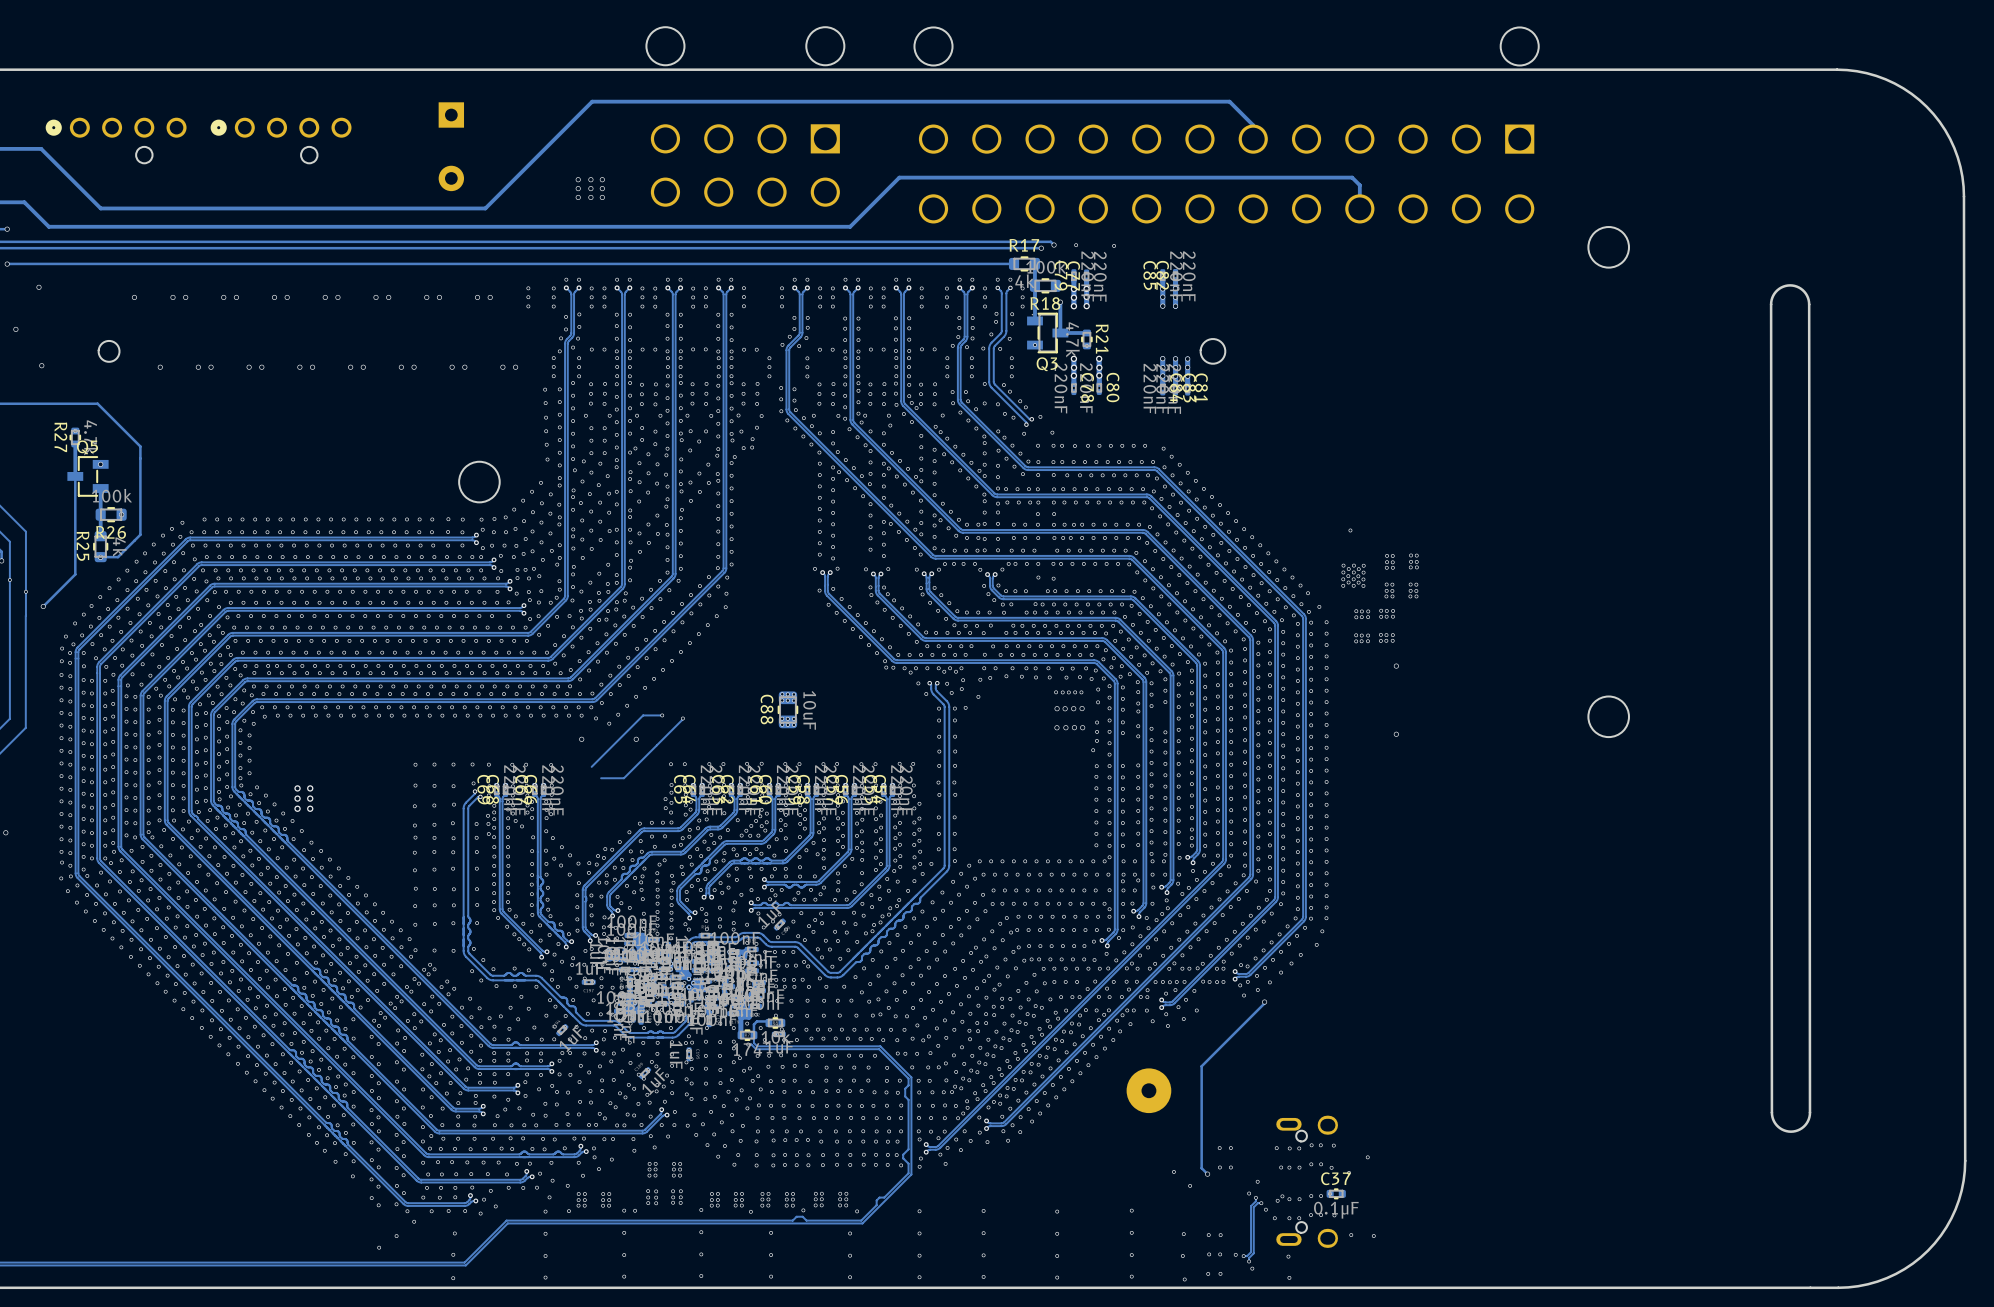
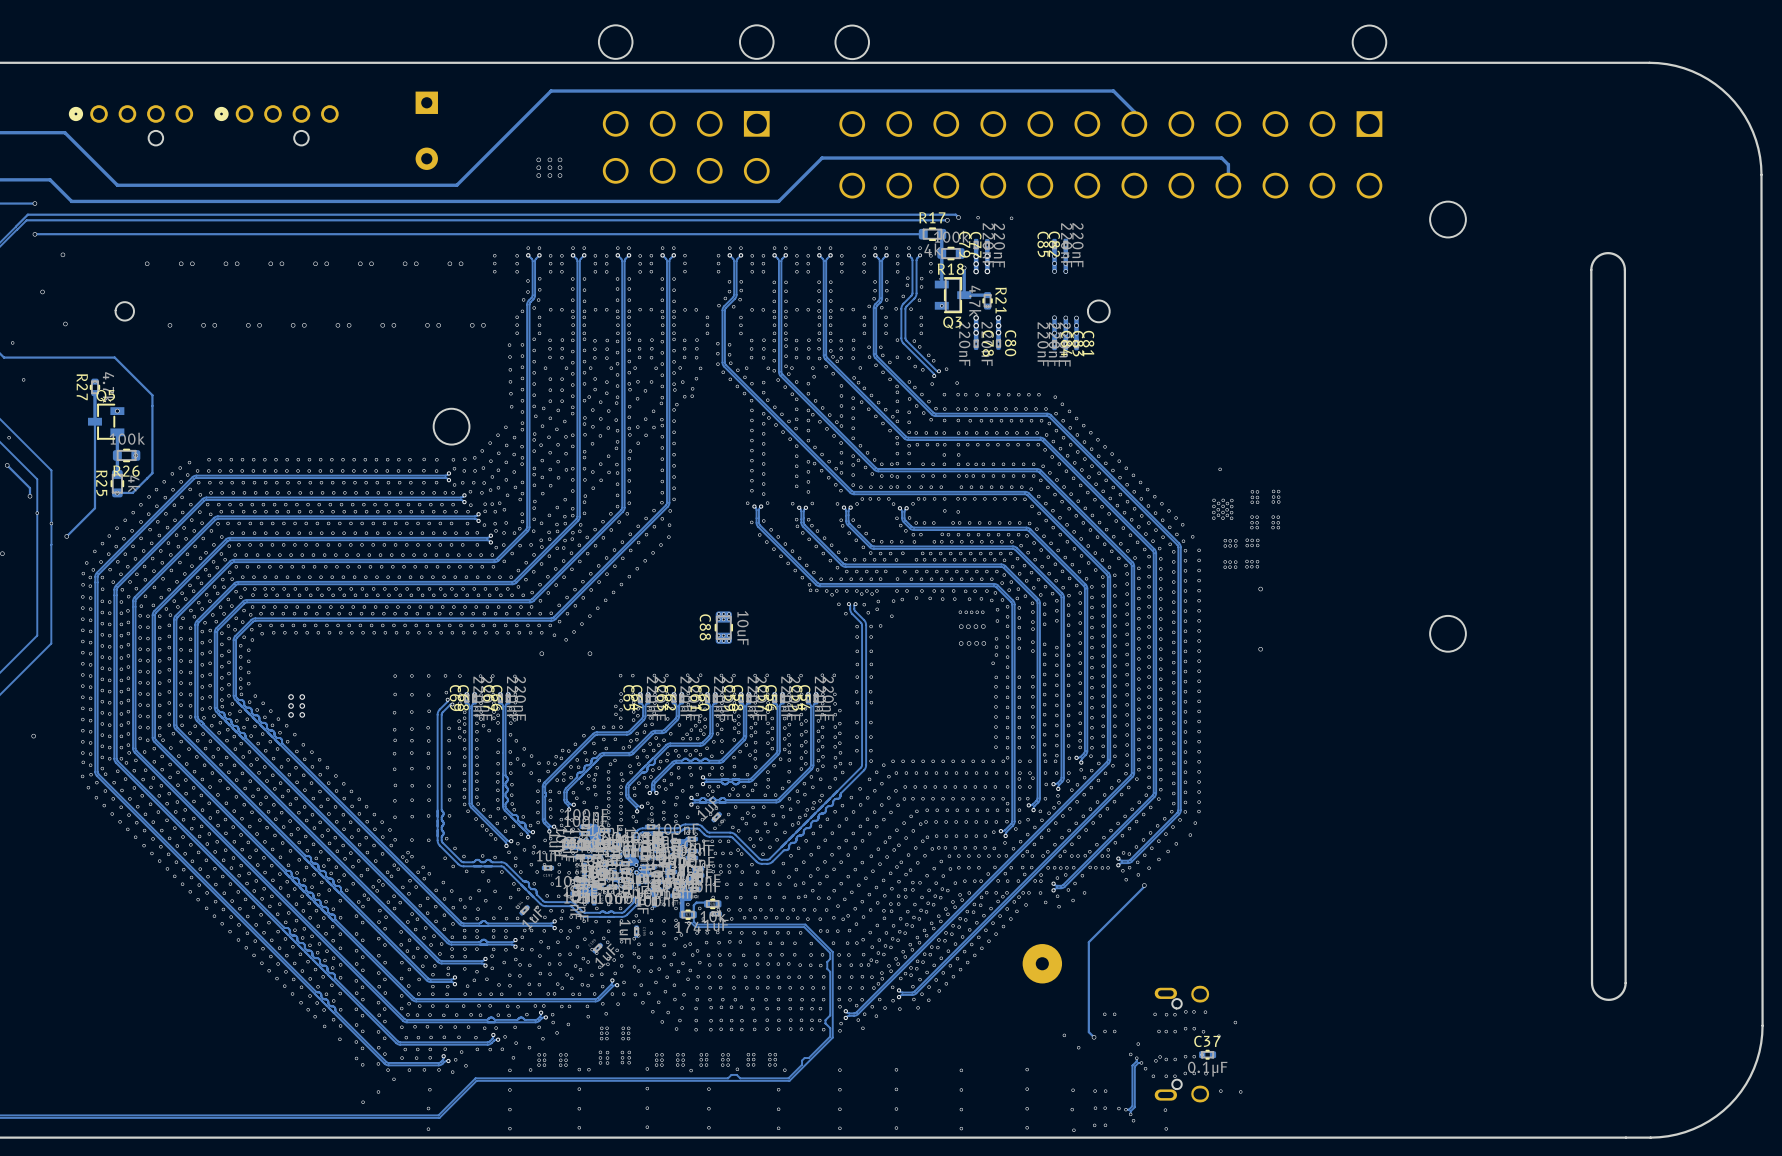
track: (662, 715) (643, 715) (591, 766) -> none
via: (662, 715) -> none
track: (682, 718) (623, 778) (601, 778) -> none
via: (682, 718) -> none

